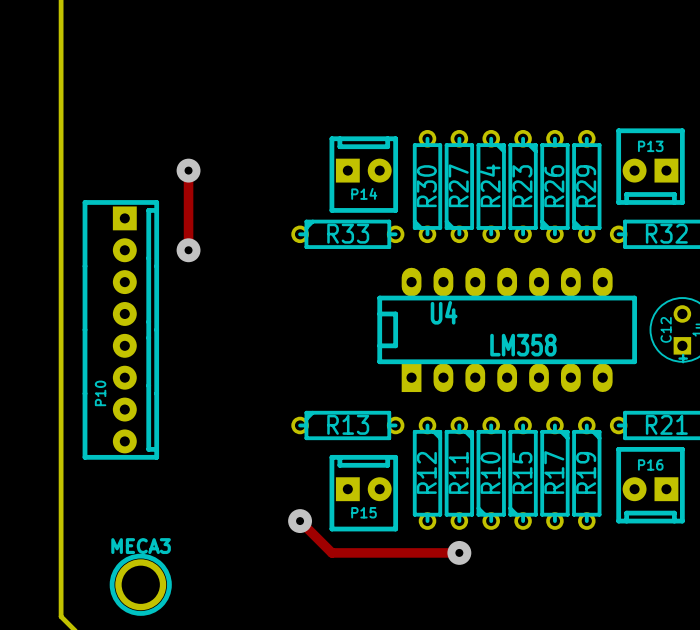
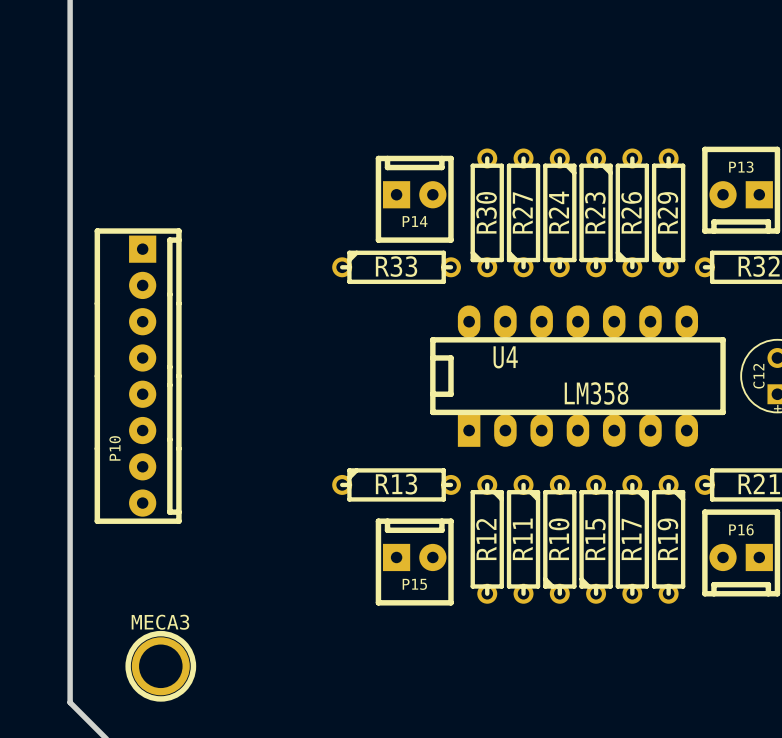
track: (188, 170) (188, 250) -> none
via: (188, 170) -> none
via: (188, 250) -> none
track: (300, 521) (331, 552) (459, 552) -> none
via: (300, 521) -> none
via: (459, 552) -> none

